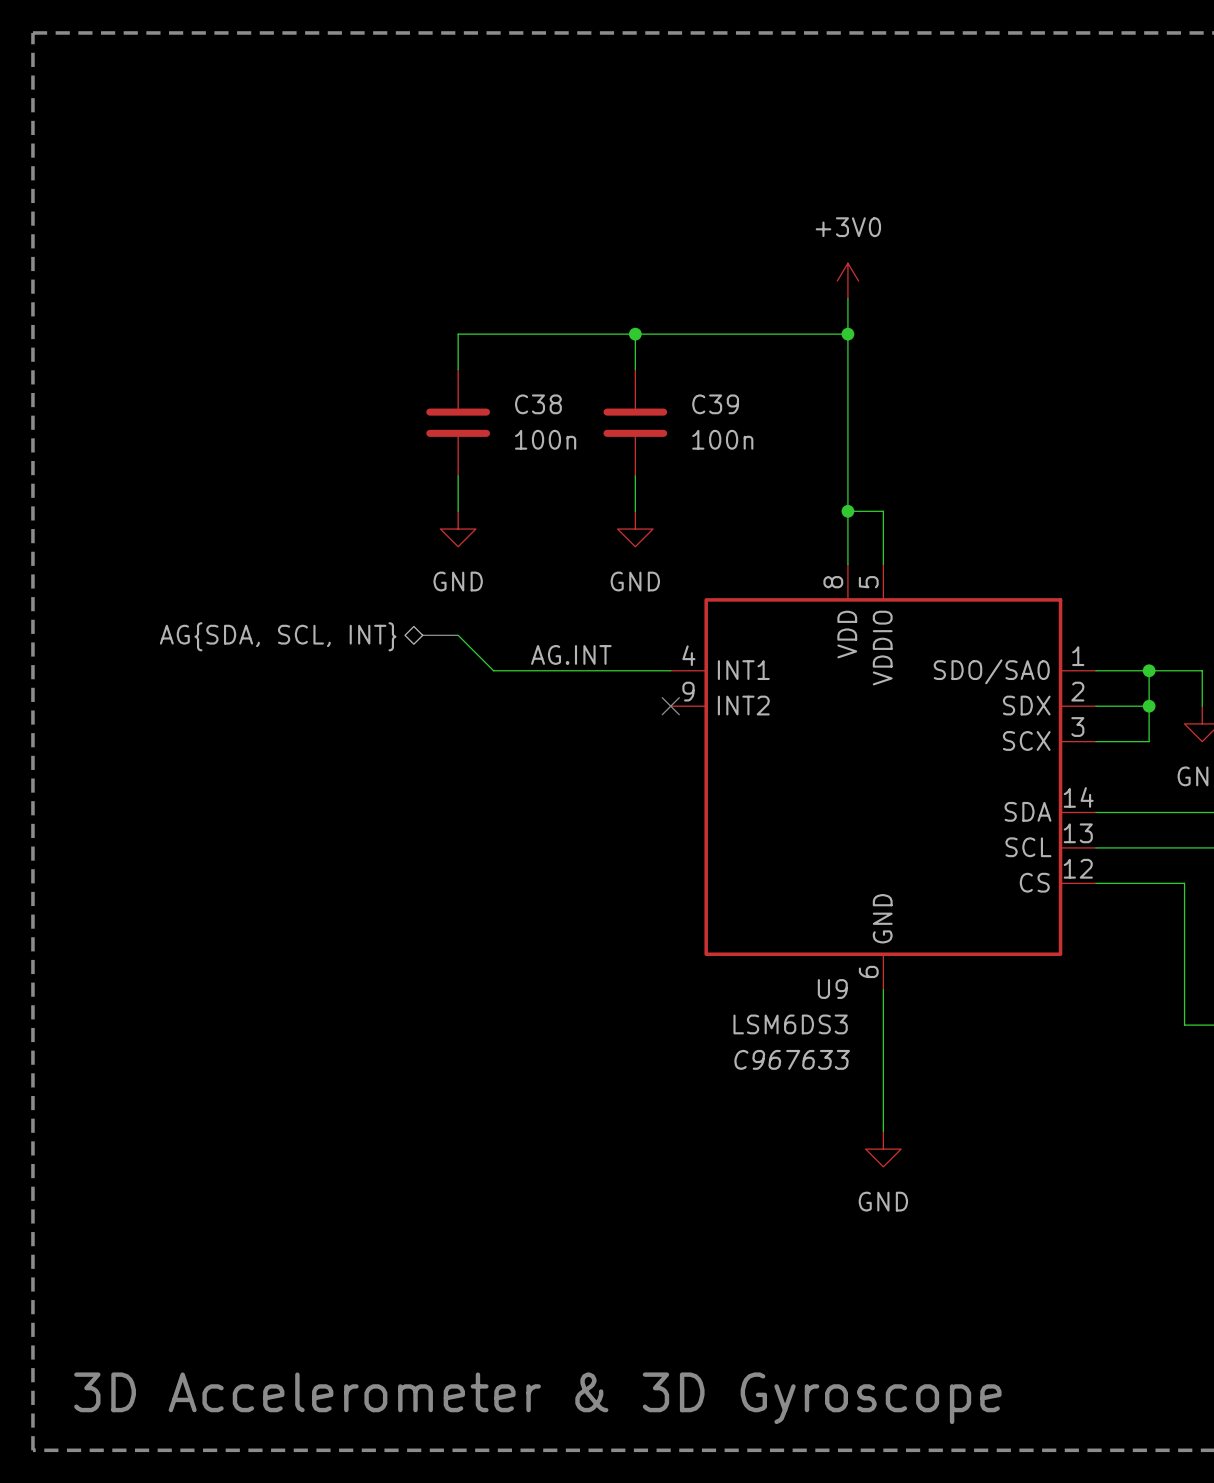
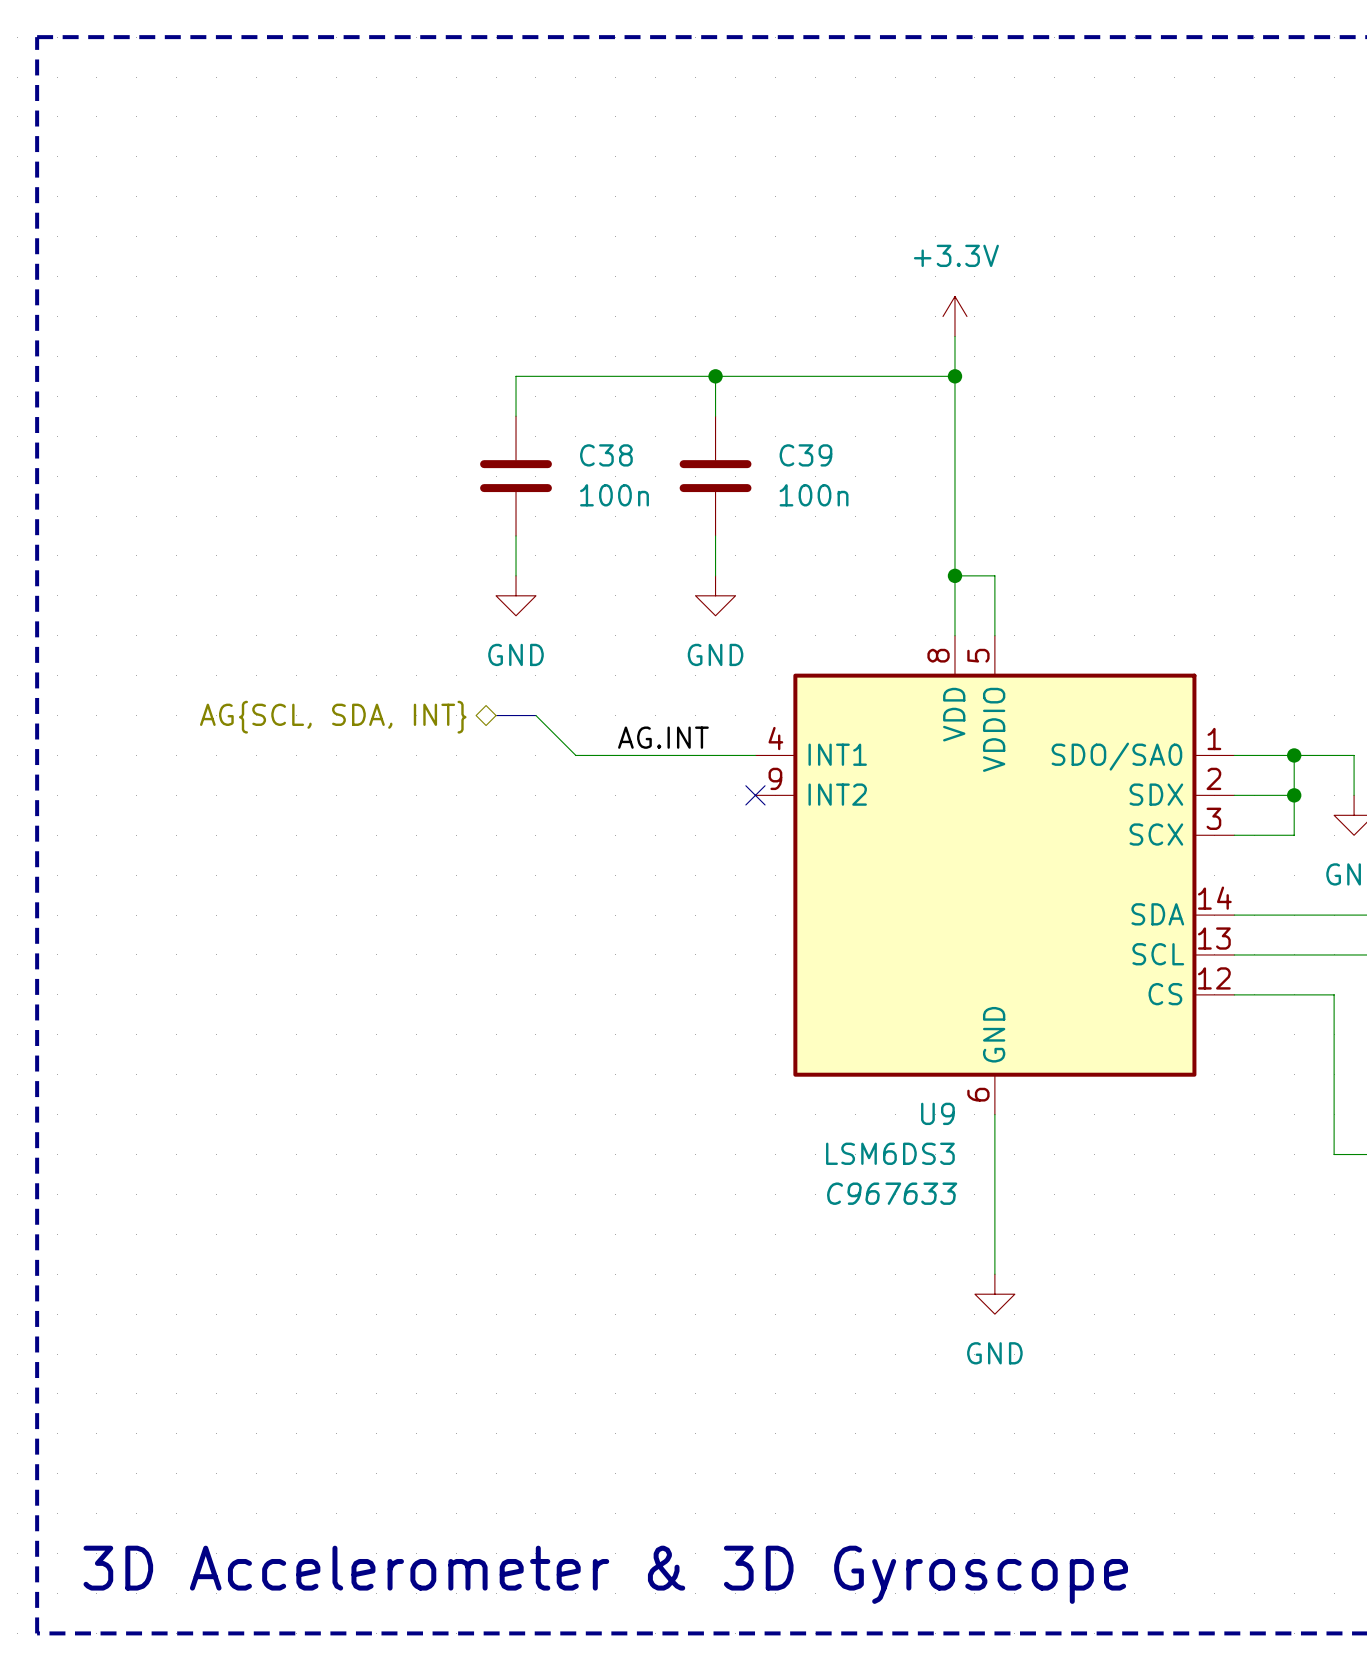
power symbol: +3V0 (847, 280) -> +3.3V (954, 316)
bus: (422, 635) (440, 635) -> (516, 715) (535, 715)
wire: (458, 635) (493, 670) (511, 670) -> (535, 715) (575, 755)
hierarchical label: AG{SDA, SCL, INT} (278, 636) -> AG{SCL, SDA, INT} (333, 717)
label position: AG.INT (571, 654) -> AG.INT (663, 737)

